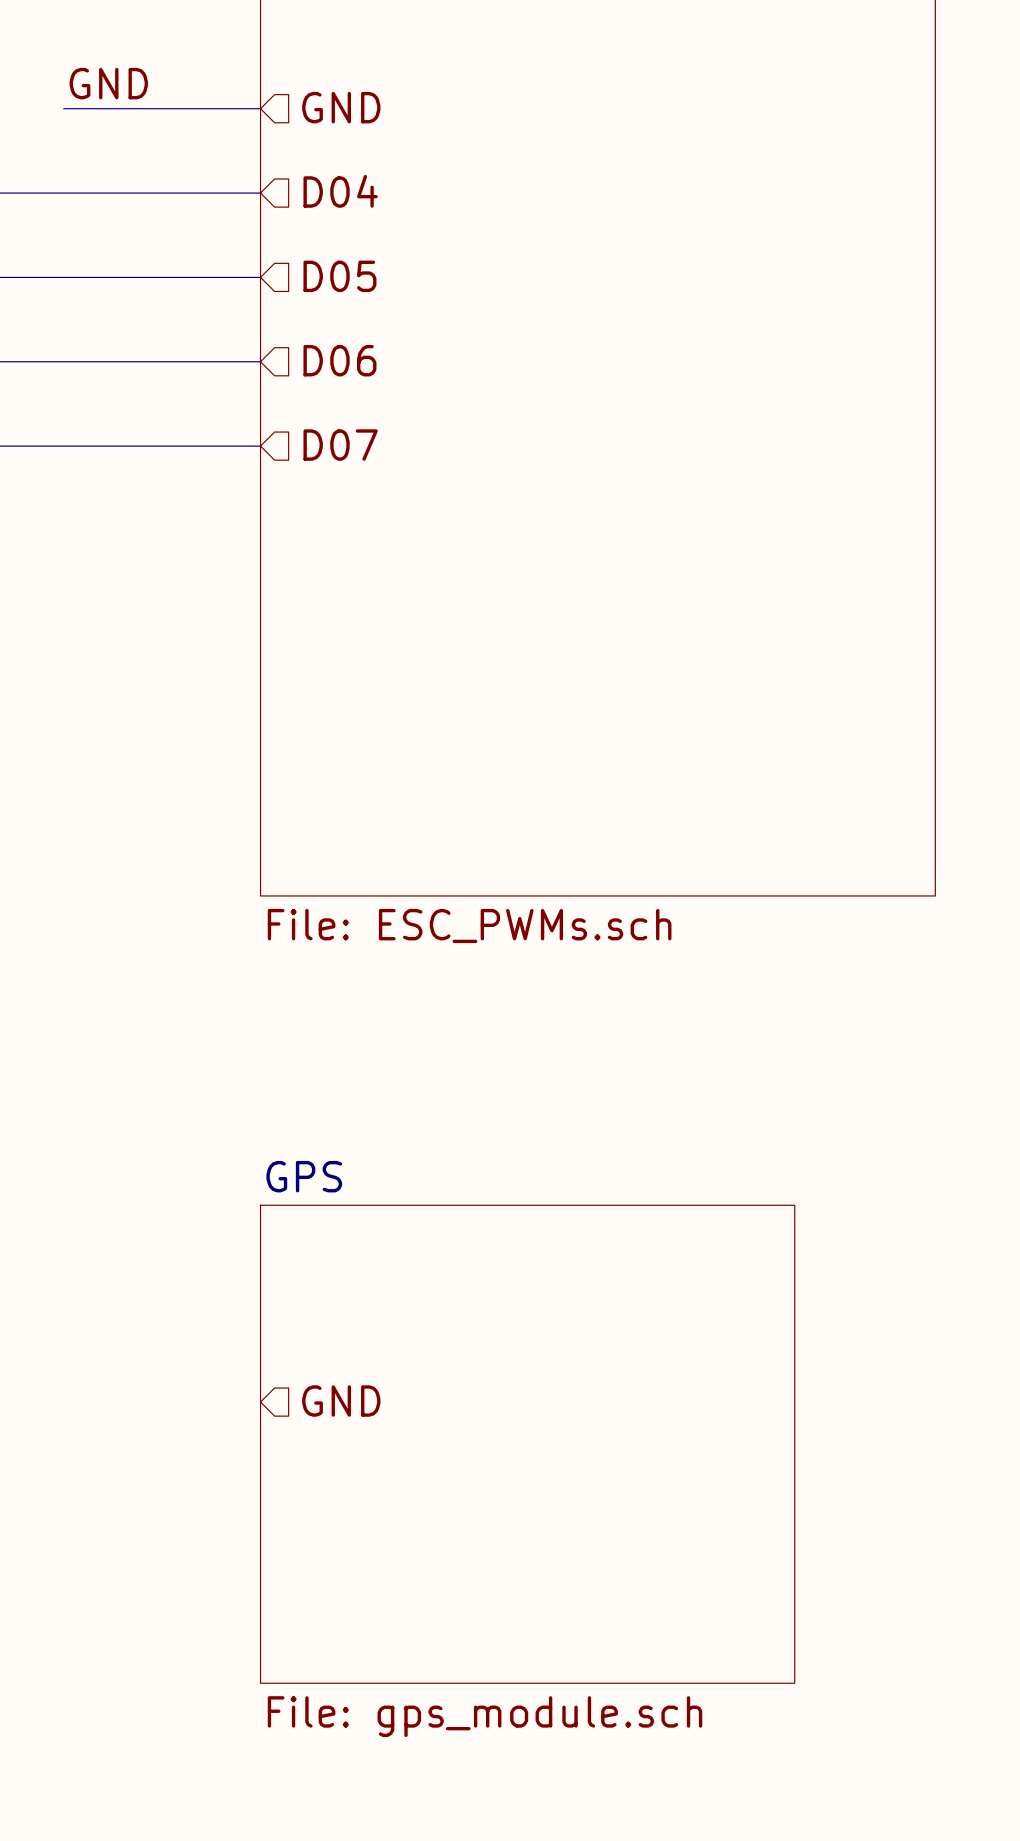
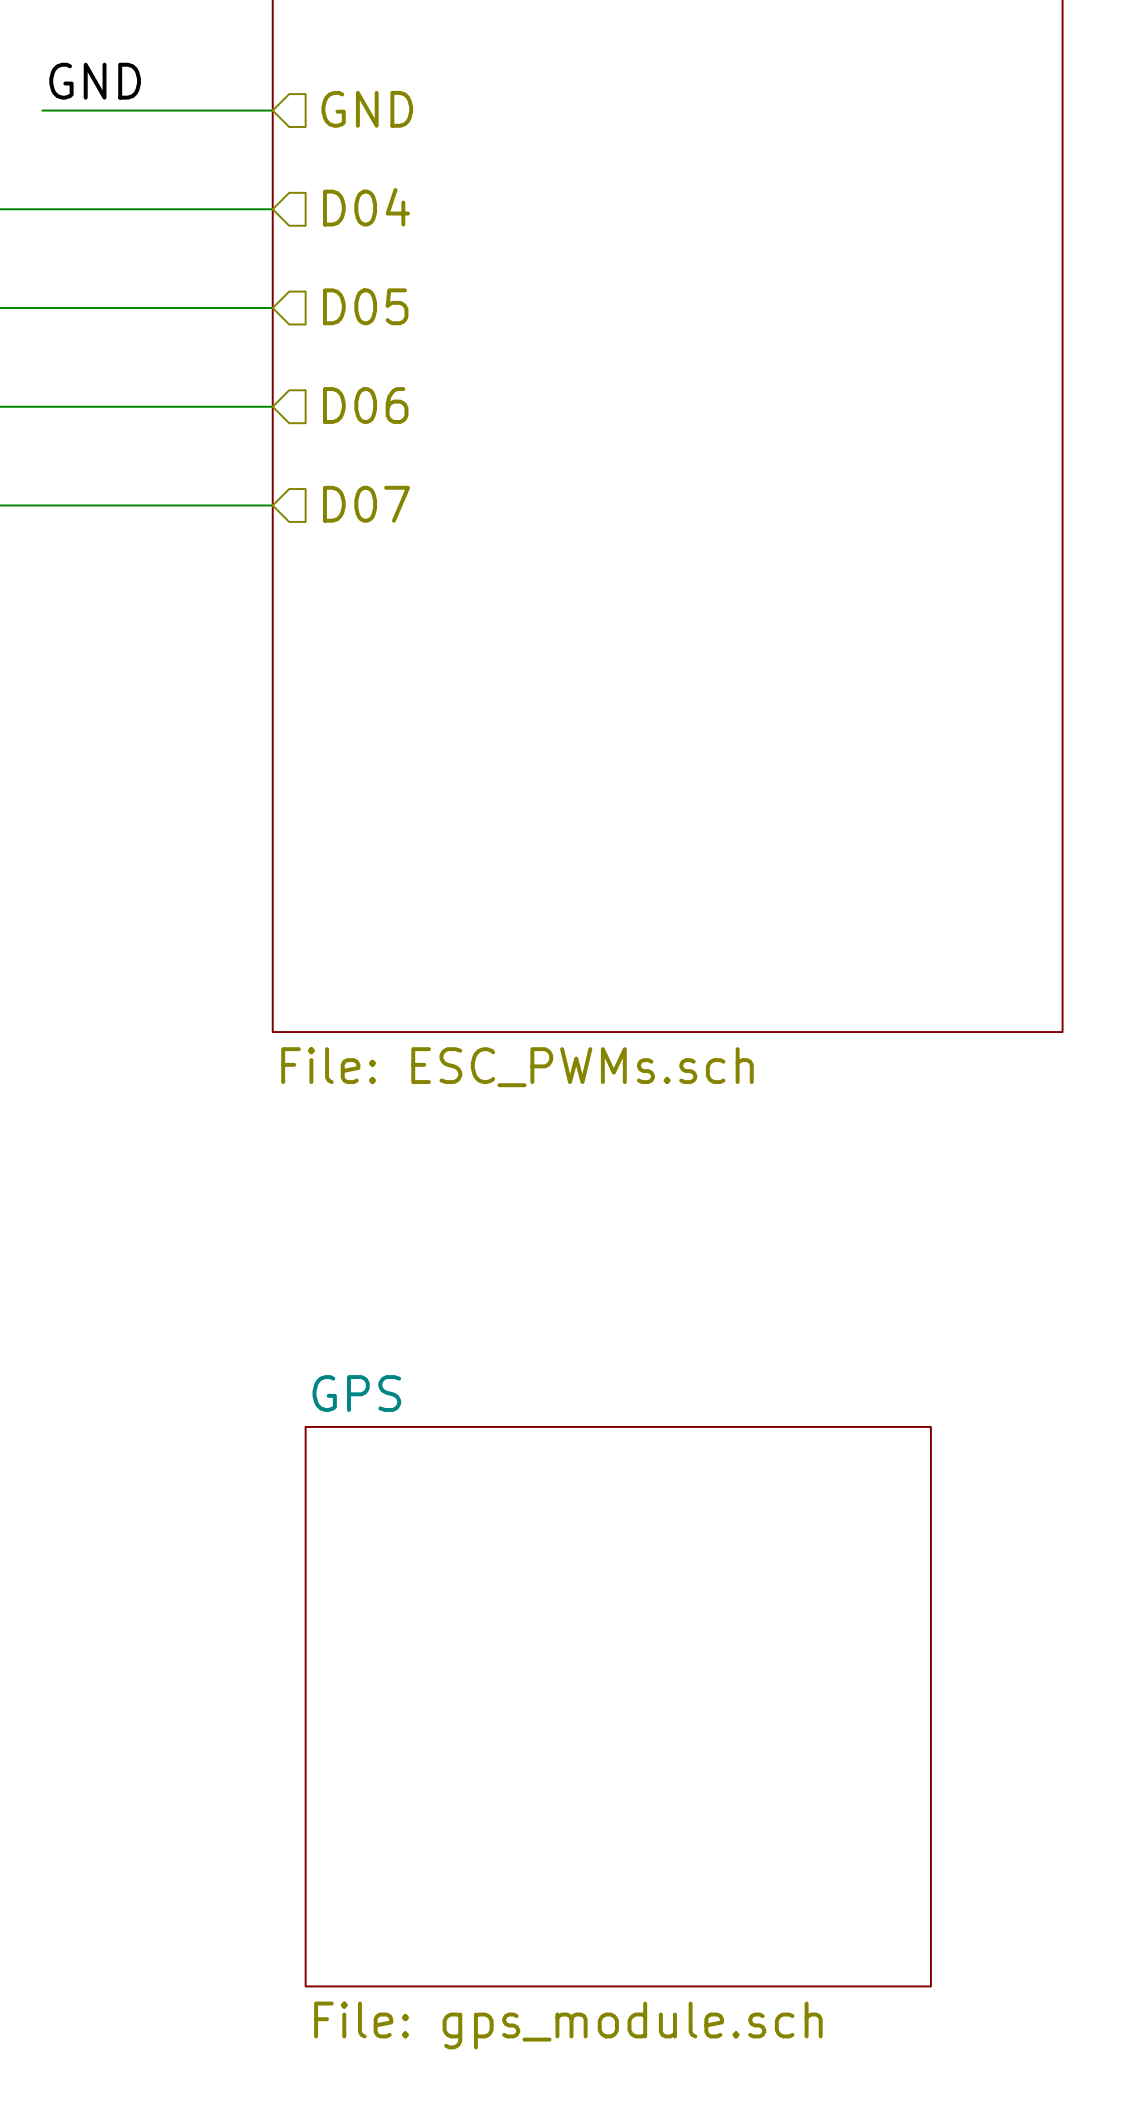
hierarchical label: GND (341, 1401) -> none
sheet GPS position: (527, 1444) -> (618, 1706)

